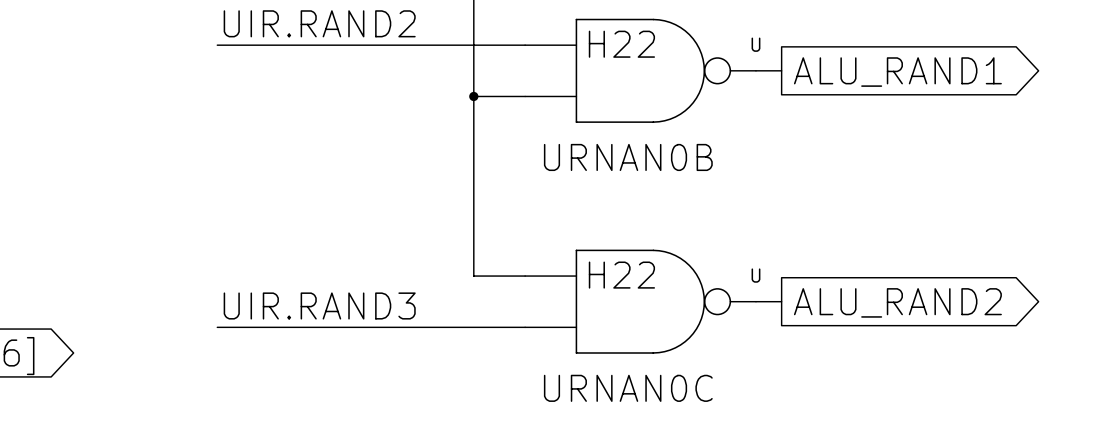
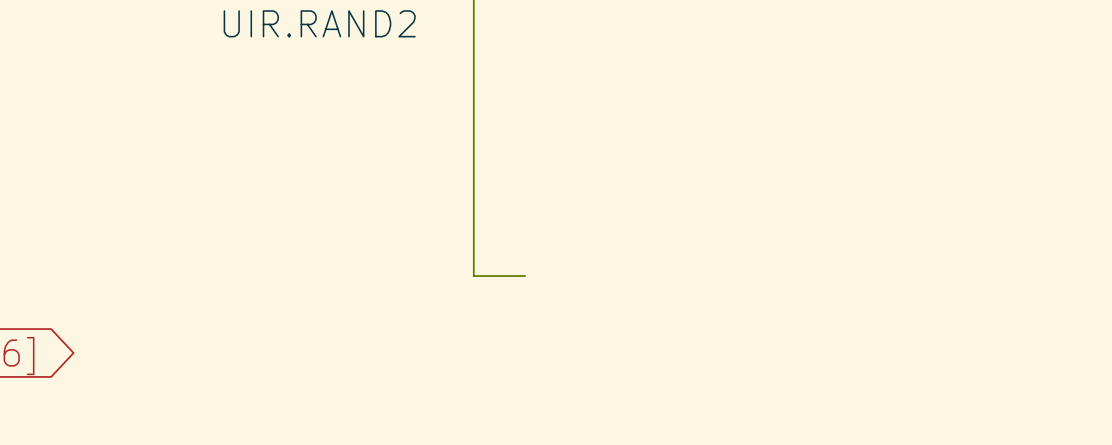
wire: (217, 45) (525, 45) -> none
U: (640, 70) -> none
wire: (755, 70) (781, 70) -> none
global label: ALU_RAND1 (897, 72) -> none
wire: (473, 96) (525, 96) -> none
junction: (473, 96) -> none
U: (640, 301) -> none
wire: (755, 301) (781, 301) -> none
global label: ALU_RAND2 (897, 302) -> none
label: UIR.RAND3 (319, 305) -> none
wire: (217, 327) (525, 327) -> none

